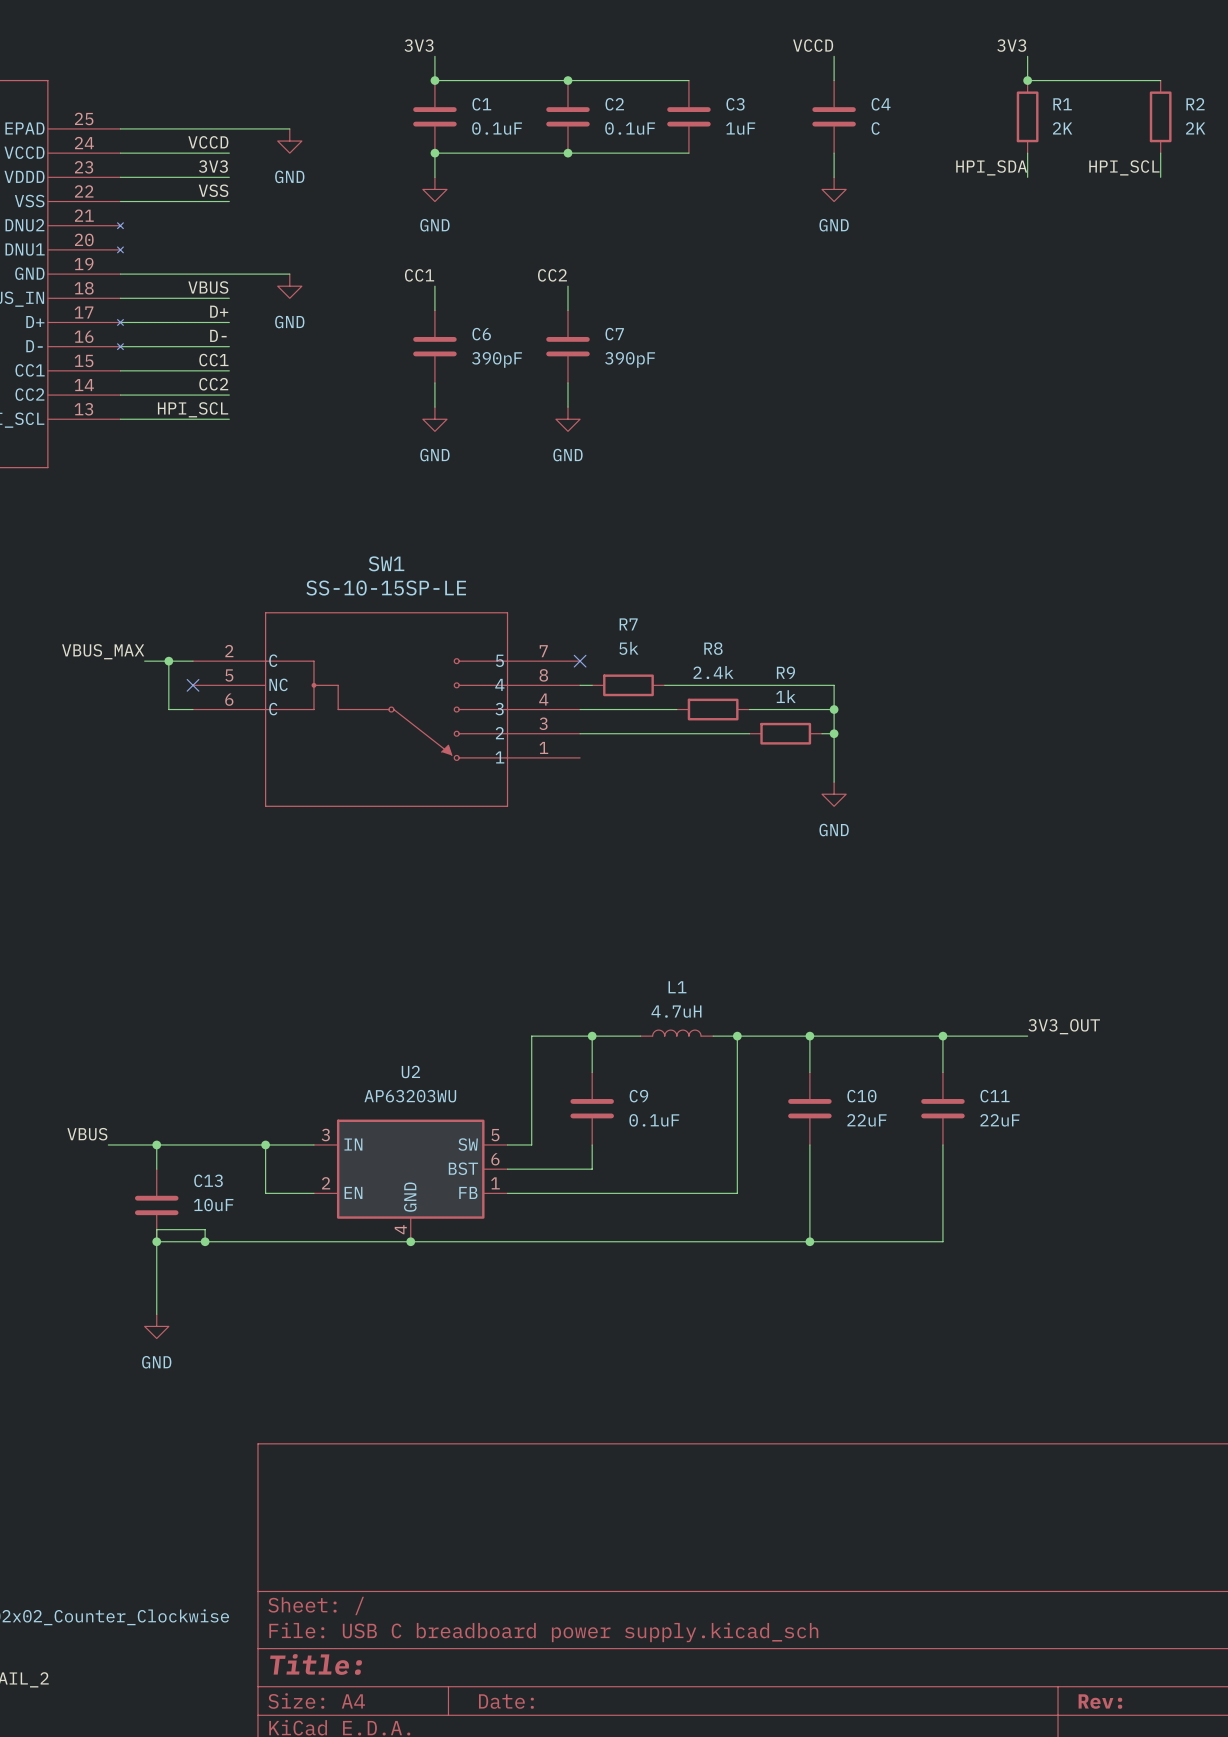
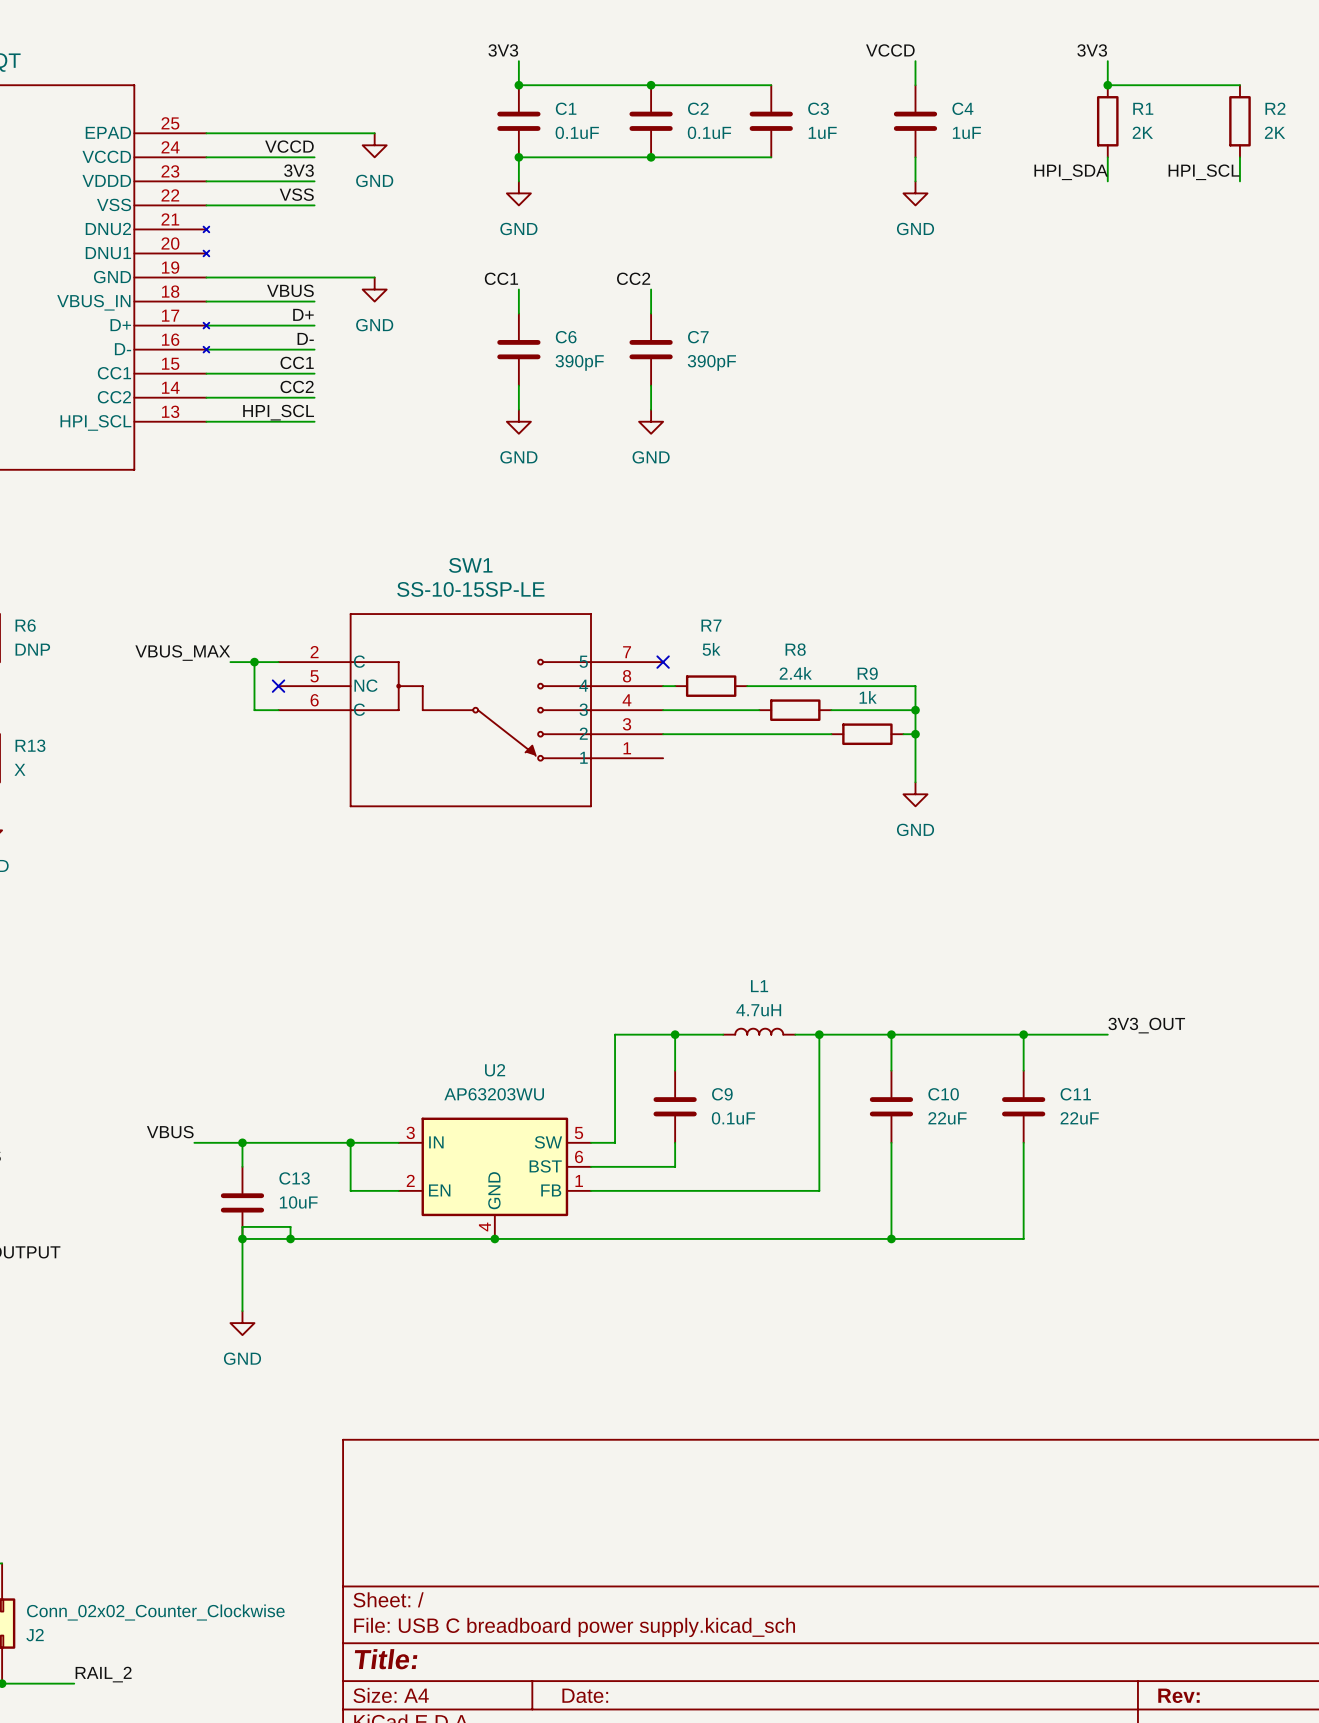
C4 value: C (875, 128) -> 1uF (966, 132)

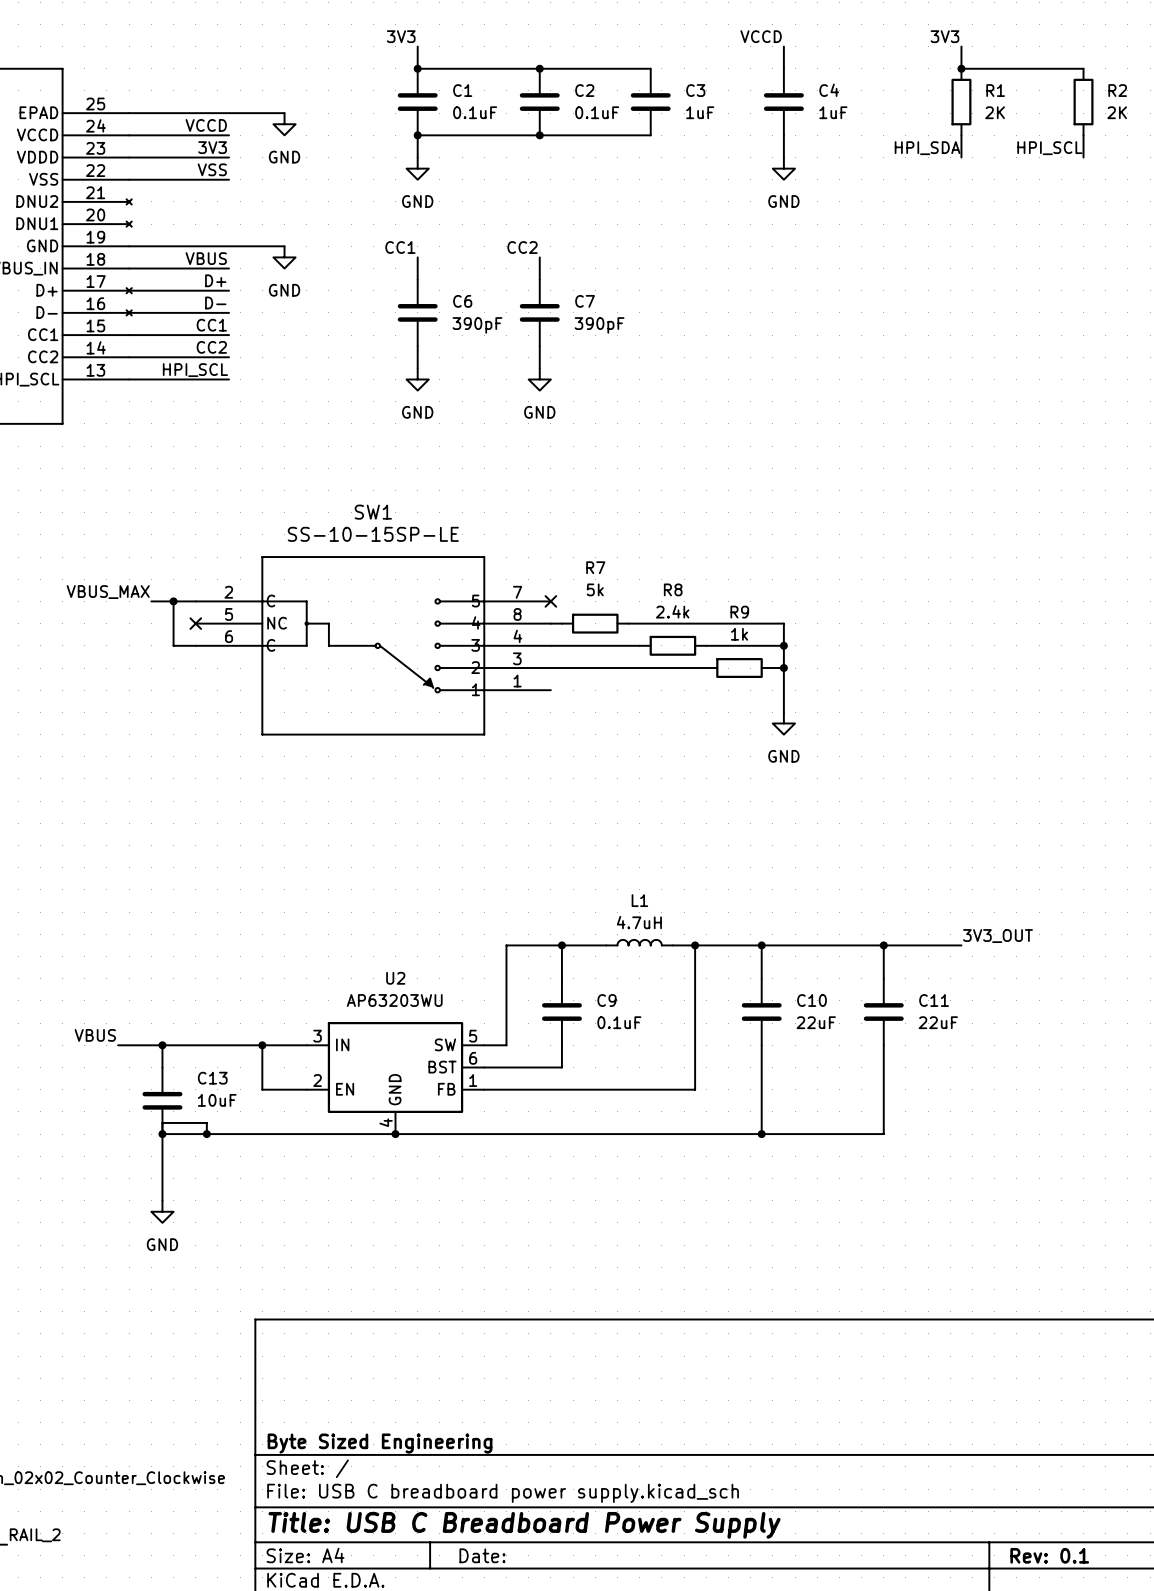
title block: none -> Byte Sized Engineering (380, 1443)
title block: Title: (386, 1659) -> Title: USB C Breadboard Power Supply (524, 1525)
title block: Rev: (1178, 1695) -> Rev: 0.1 (1049, 1555)

